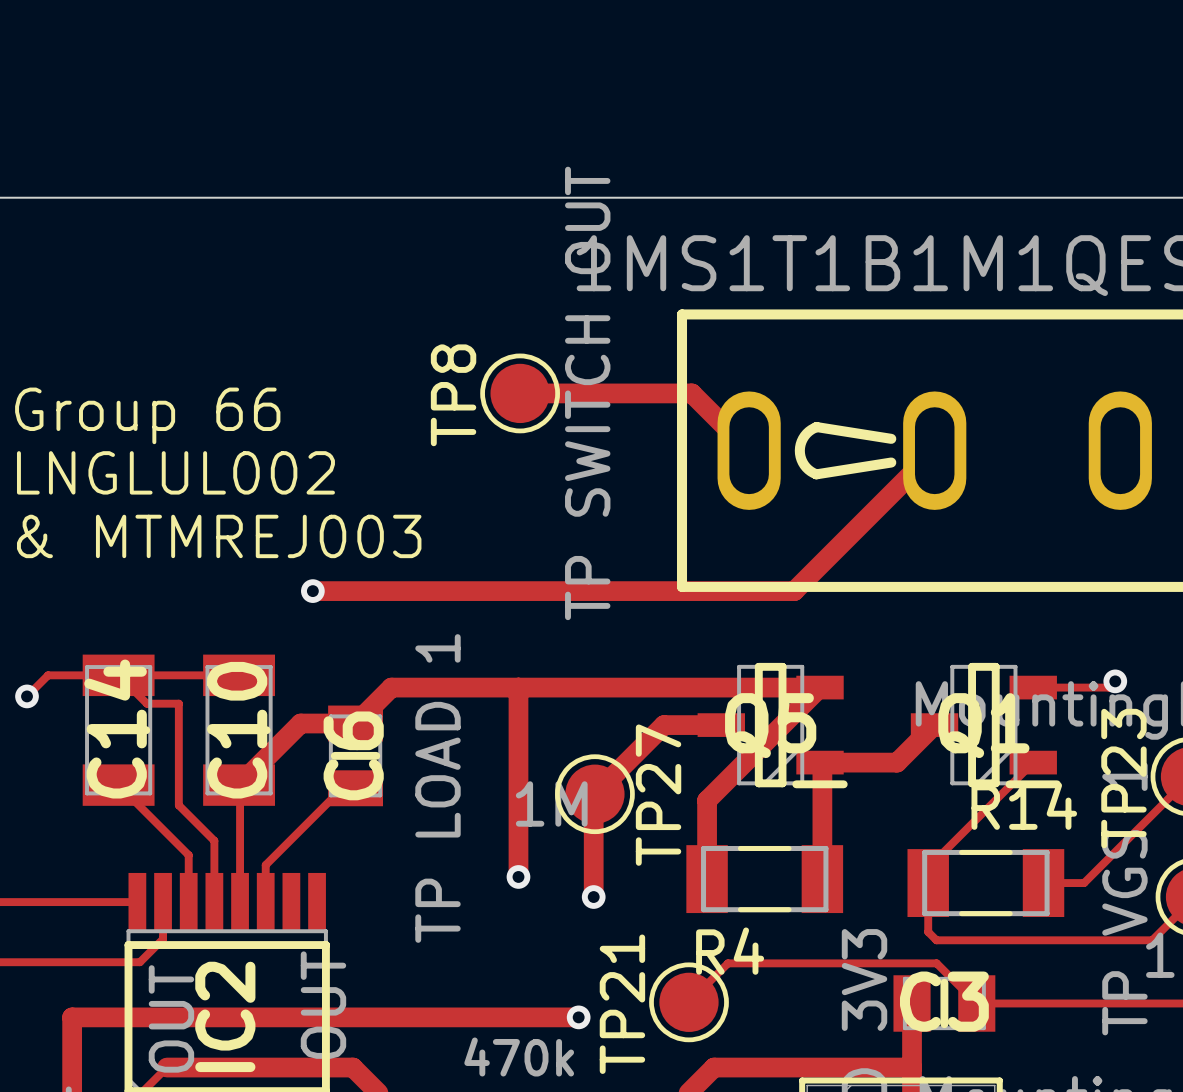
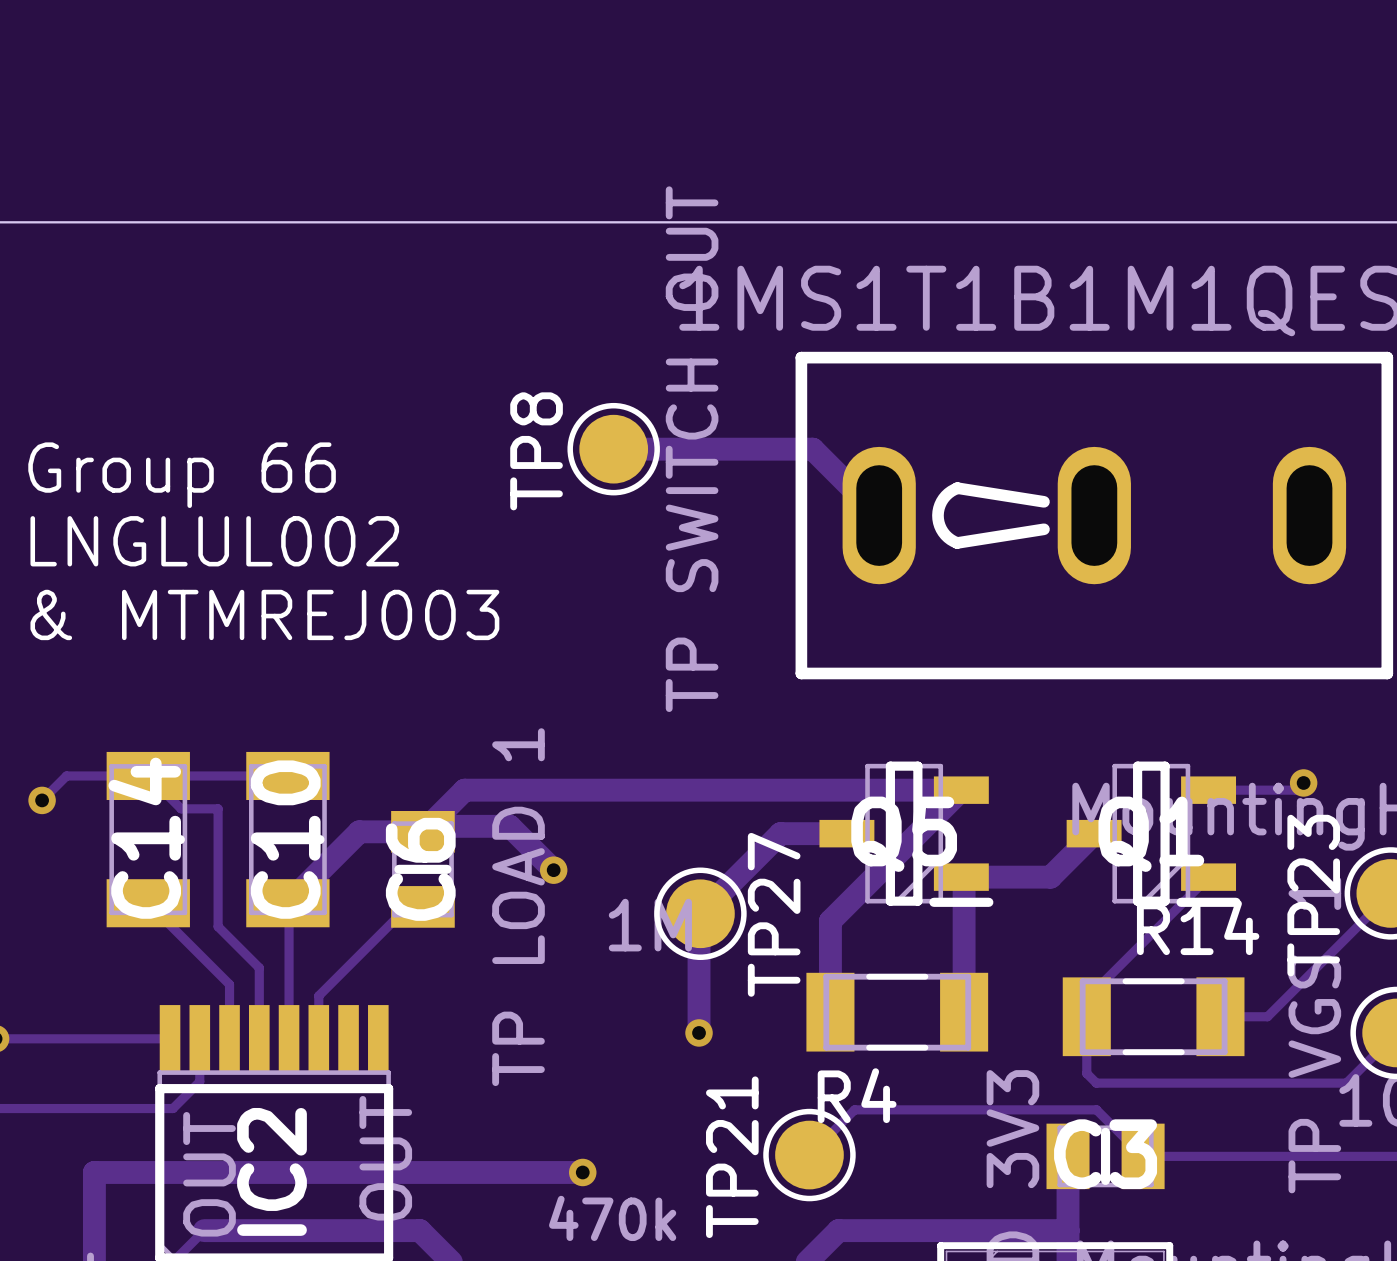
track: (934, 450) (794, 591) (312, 591) -> none
via: (312, 591) -> none
track: (518, 687) (518, 876) -> none
track: none -> (428, 826) (509, 826) (553, 870)
via: none -> (553, 870)
via: (518, 876) -> none
track: (493, 1017) (578, 1017) -> none
via: none -> (582, 1172)
via: (578, 1017) -> none

